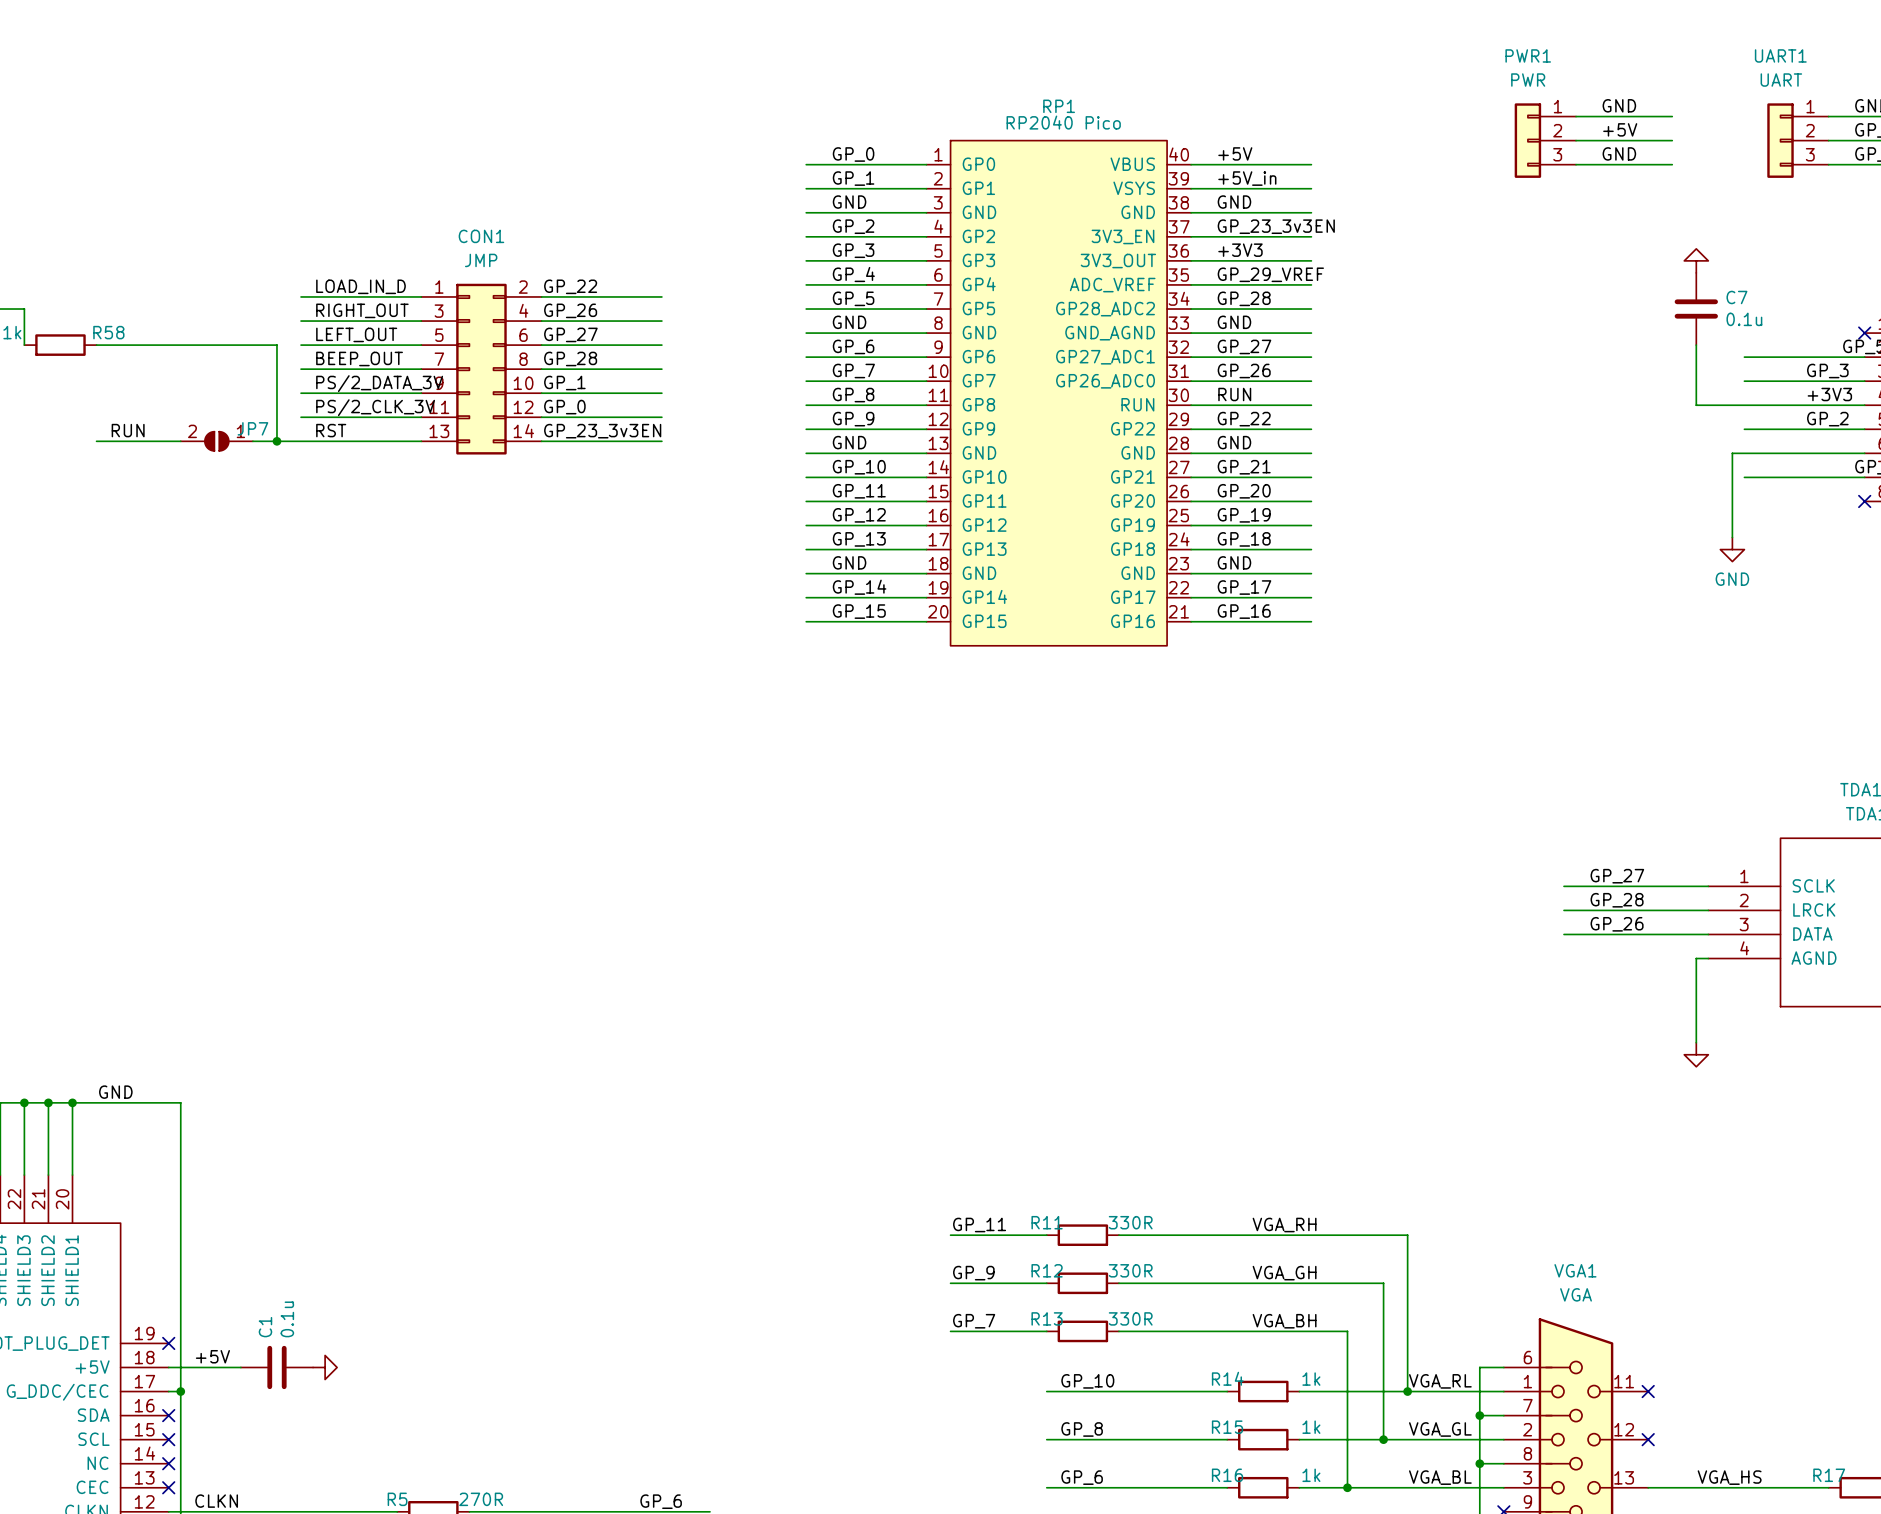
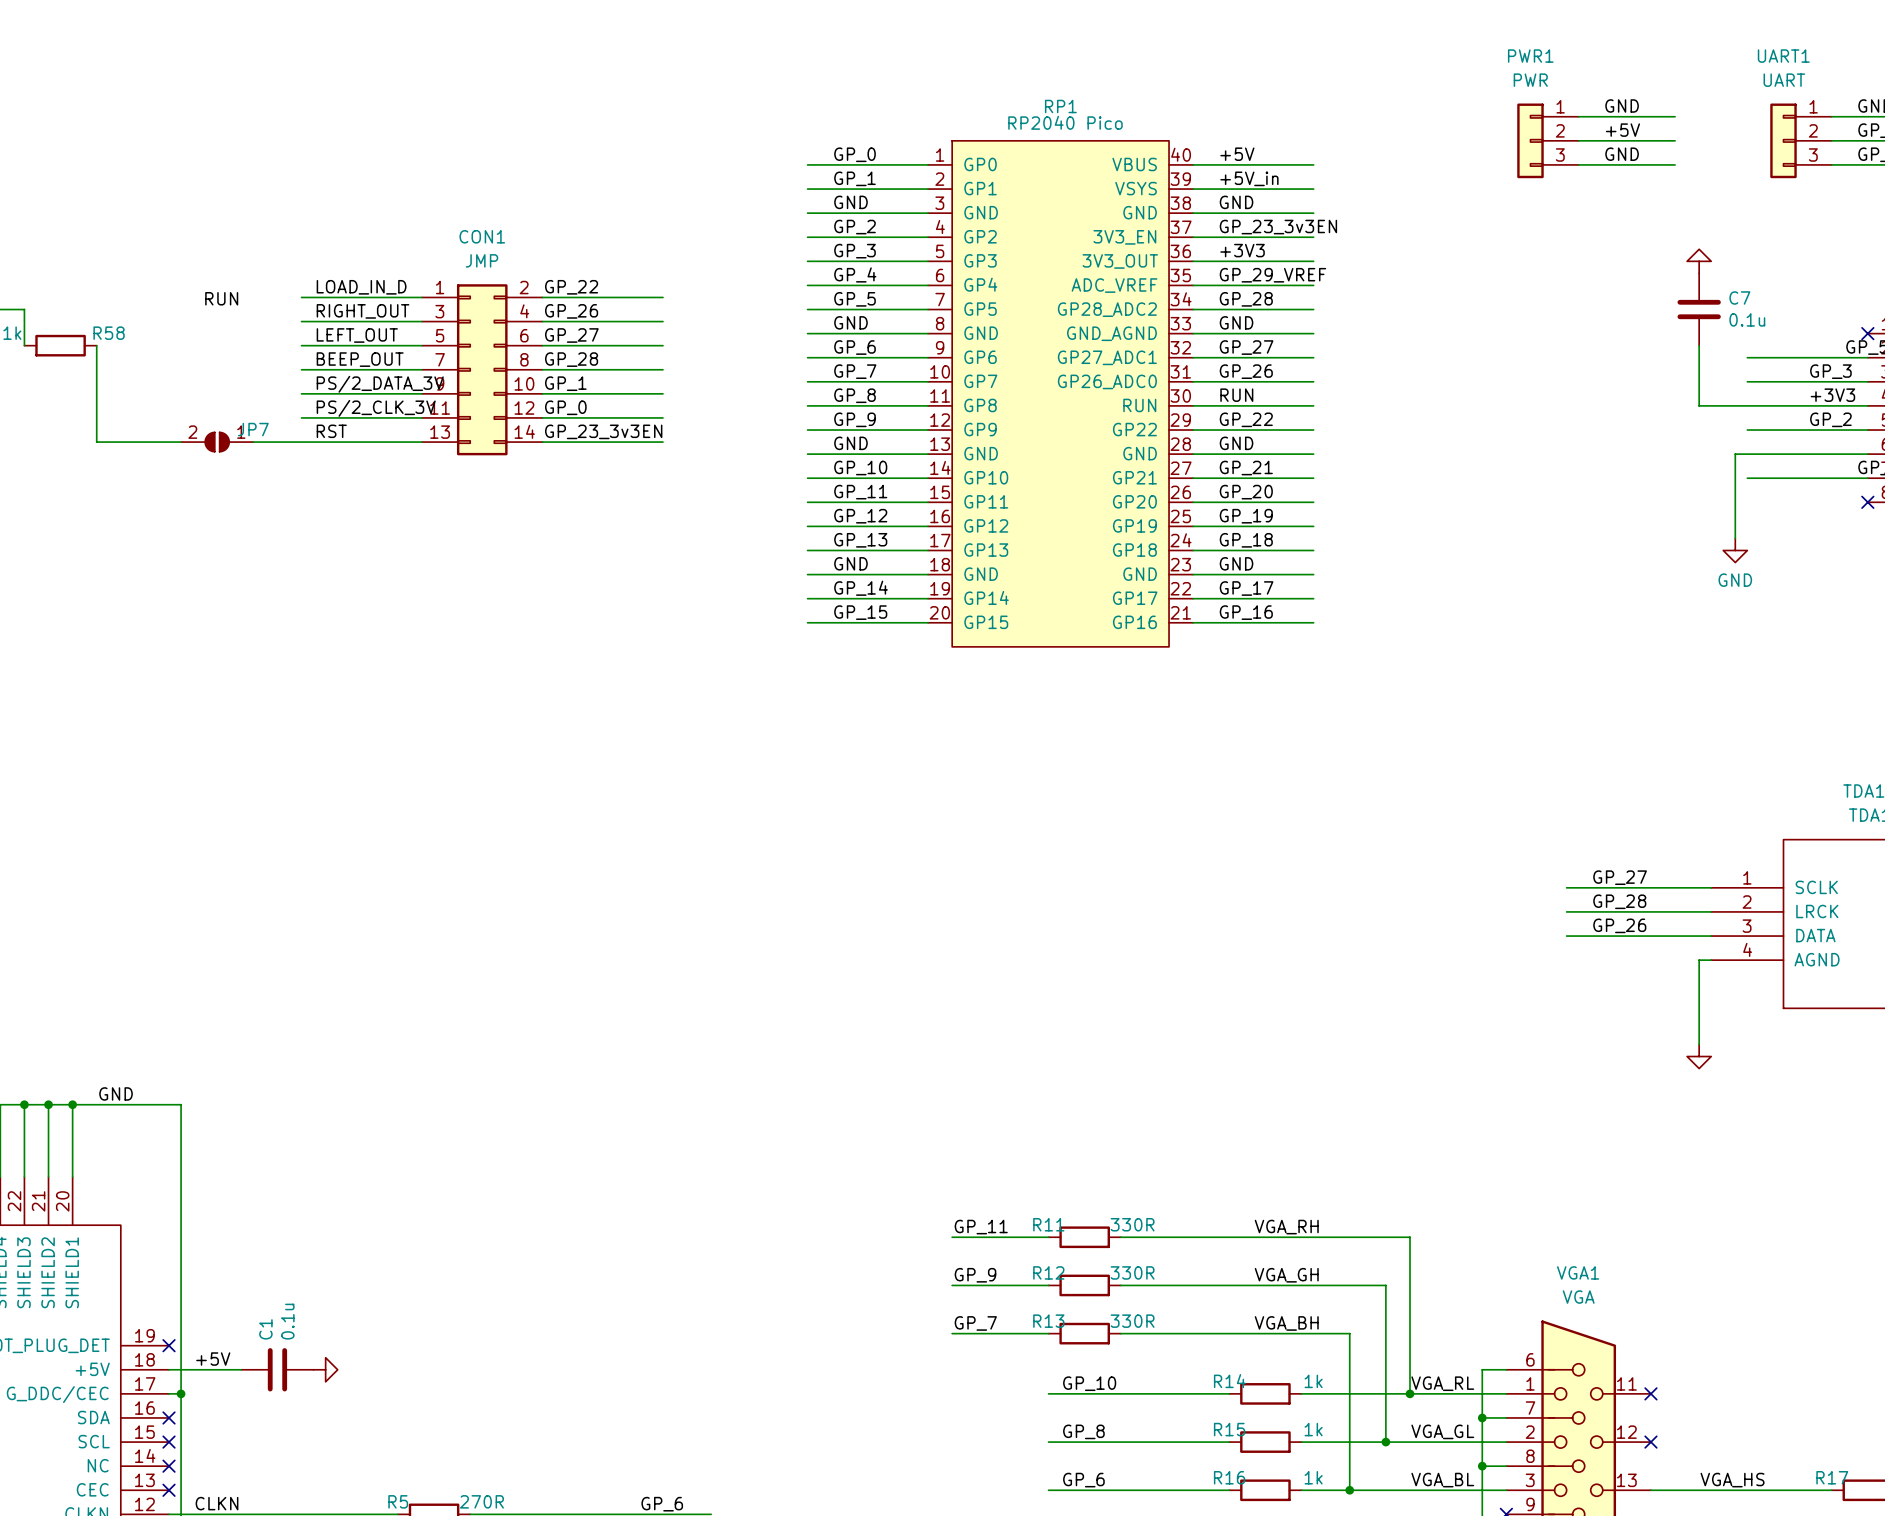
wire: (96, 345) (276, 345) (276, 441) -> (96, 345) (96, 442)
label position: RUN (128, 430) -> RUN (221, 298)
junction: (276, 441) -> none

